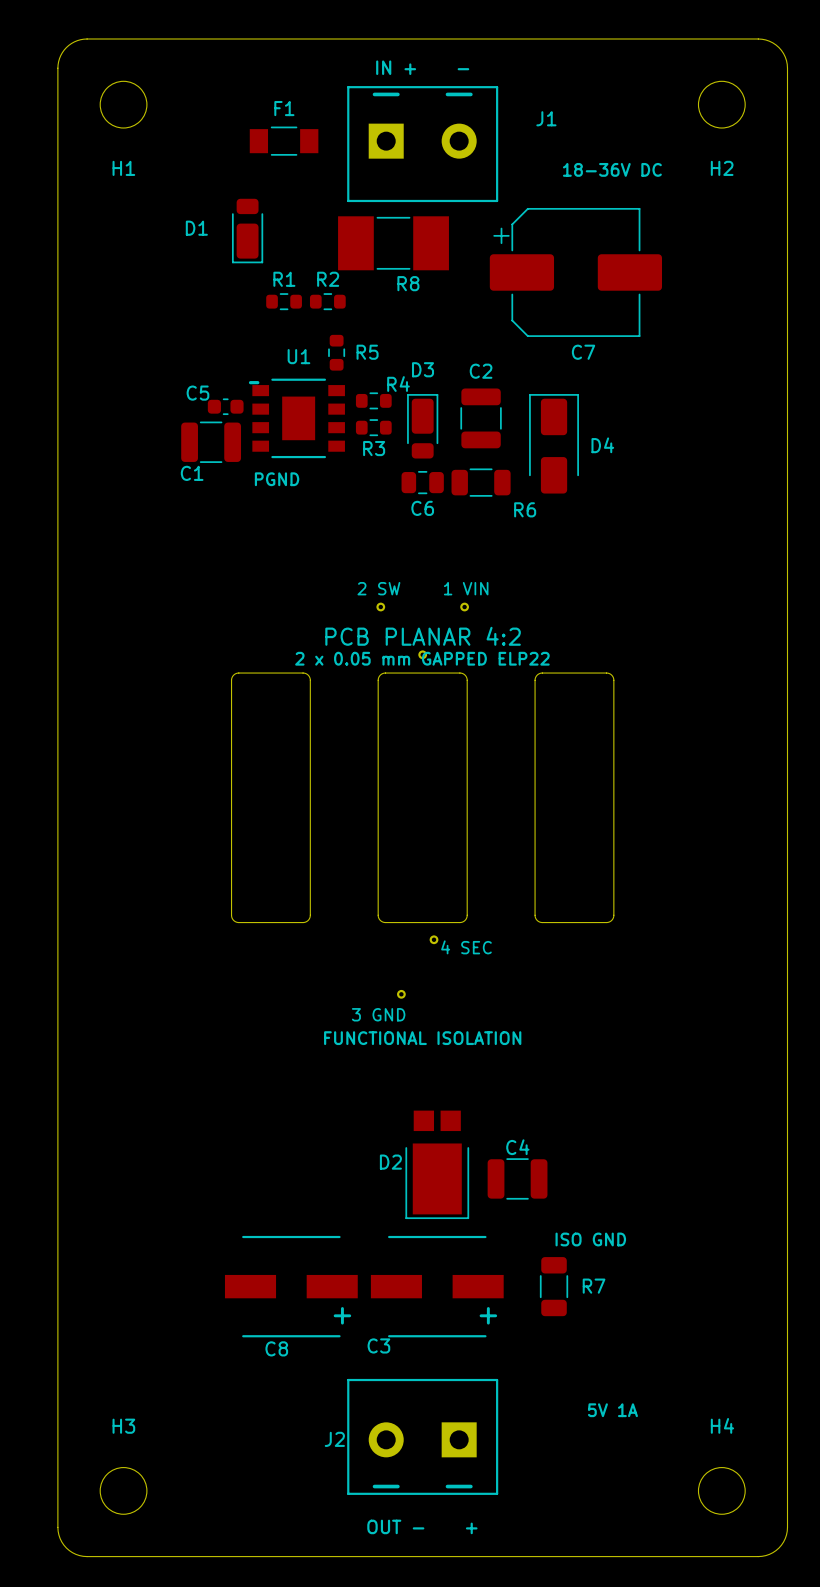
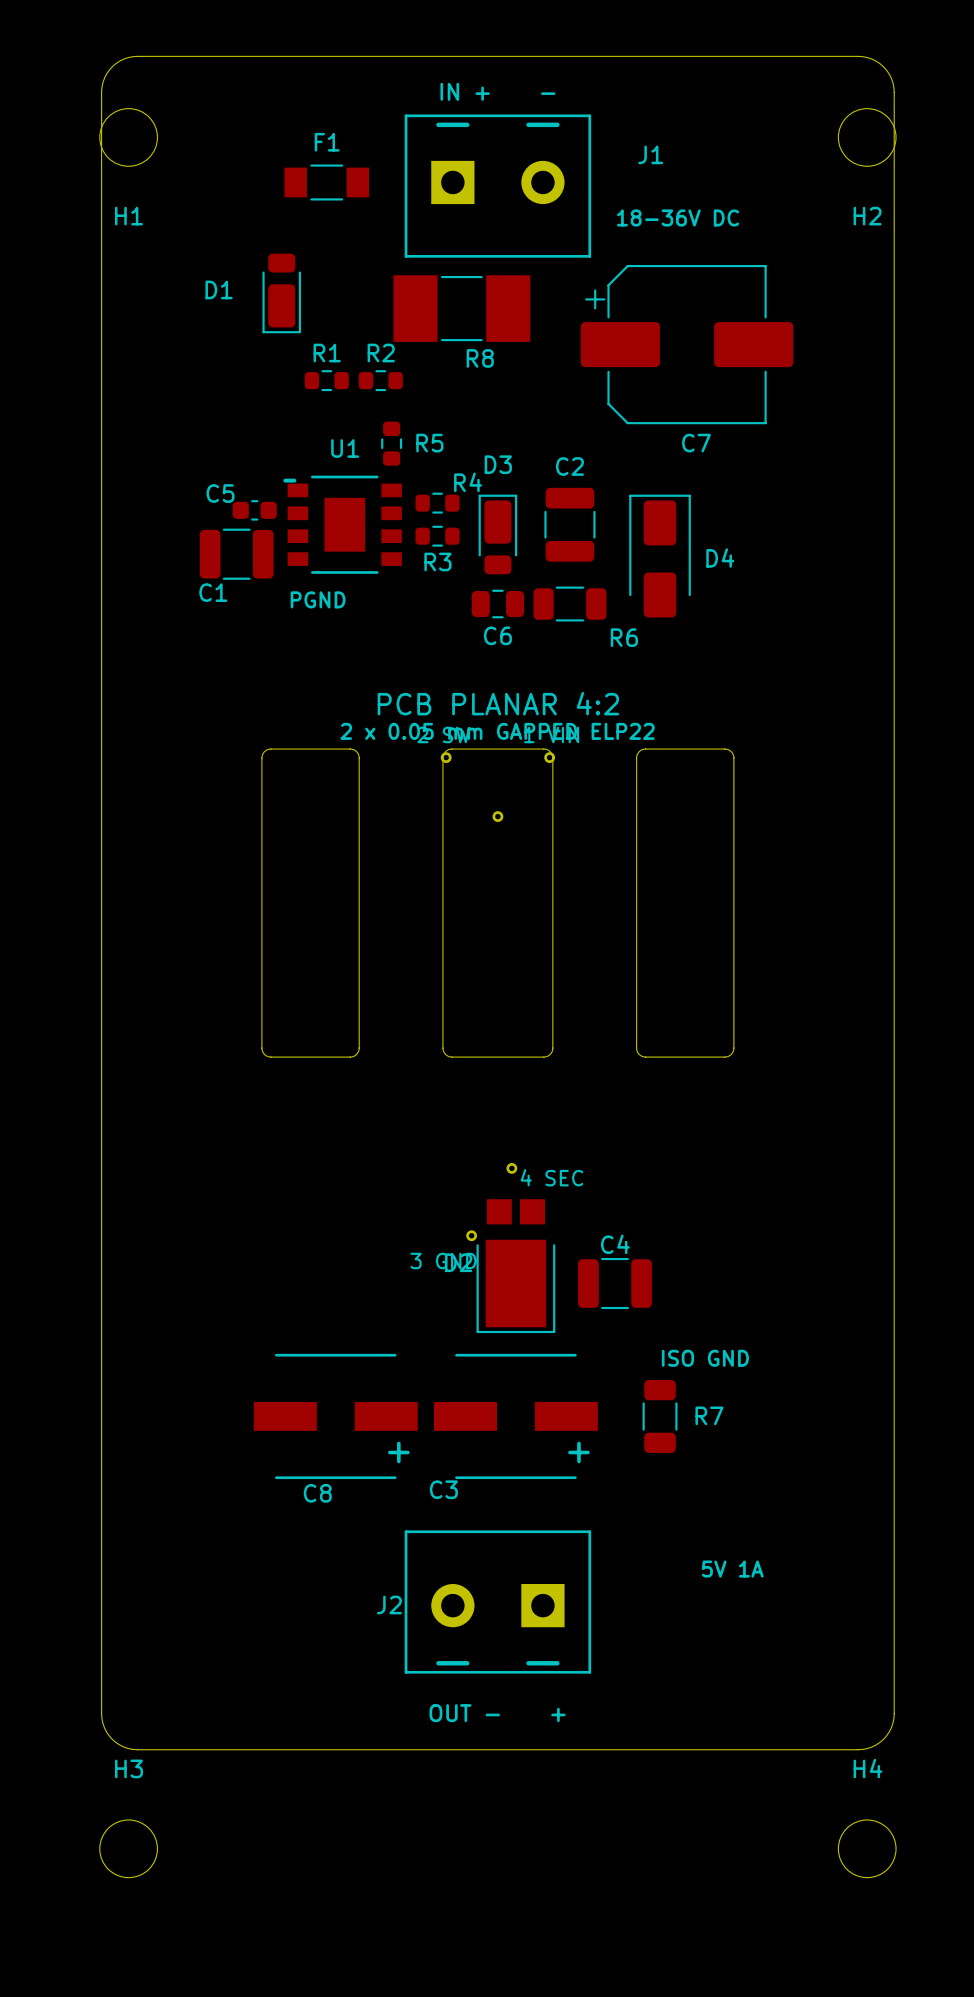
board edge: (130, 39) (77, 40) (68, 45) (62, 52) (57, 68) (57, 1527) (60, 1538) (66, 1548) (75, 1554) (87, 1556) (758, 1556) (772, 1552) (785, 1538) (787, 1527) (787, 68) (781, 50) (769, 41) (758, 39) (714, 39) -> (137, 56) (125, 58) (112, 66) (103, 80) (101, 92) (101, 1713) (104, 1727) (112, 1739) (123, 1746) (137, 1749) (858, 1749) (876, 1744) (883, 1739) (891, 1727) (894, 1713) (894, 92) (891, 78) (883, 66) (871, 59) (858, 56)
text position: 18-36V DC (612, 169) -> 18-36V DC (678, 217)
text position: PCB PLANAR 4:2 (423, 636) -> PCB PLANAR 4:2 (498, 703)
text position: 2 x 0.05 mm GAPPED ELP22 (422, 658) -> 2 x 0.05 mm GAPPED ELP22 (497, 731)
board edge: (231, 680) (233, 675) (238, 673) (303, 673) (308, 675) (310, 680) -> (261, 848) (261, 757) (264, 751) (270, 749) (350, 749) (356, 751) (359, 758) (359, 848)
board edge: (378, 680) (380, 675) (385, 673) (460, 673) (465, 675) (467, 680) -> (442, 848) (443, 757) (445, 751) (451, 749) (543, 749) (550, 751) (552, 758) (552, 848)
board edge: (535, 680) (537, 675) (542, 673) (607, 673) (612, 675) (613, 680) -> (636, 848) (636, 757) (639, 751) (645, 749) (724, 749) (731, 751) (733, 758) (733, 848)
board edge: (231, 842) (231, 916) (233, 920) (238, 922) (303, 922) (308, 920) (310, 915) (310, 842) -> (261, 1048) (264, 1054) (270, 1057) (351, 1057) (356, 1054) (359, 1048)
board edge: (378, 842) (378, 916) (380, 920) (385, 922) (459, 922) (465, 920) (467, 915) (467, 842) -> (442, 1048) (445, 1054) (451, 1057) (545, 1057) (550, 1054) (552, 1048)
board edge: (535, 842) (535, 916) (537, 920) (542, 922) (606, 922) (611, 920) (613, 915) (613, 842) -> (636, 1048) (639, 1054) (645, 1057) (726, 1057) (731, 1054) (733, 1048)
text: FUNCTIONAL ISOLATION (422, 1038) -> none
D2 position: (437, 1164) -> (515, 1266)
C4 position: (517, 1178) -> (615, 1283)
text position: ISO GND (590, 1239) -> ISO GND (705, 1358)
C8 position: (291, 1286) -> (335, 1416)
C3 position: (437, 1286) -> (515, 1416)
R7 position: (554, 1286) -> (660, 1416)
text position: 5V 1A (612, 1410) -> 5V 1A (732, 1569)
J2 position: (422, 1436) -> (497, 1602)
text position: OUT - + (422, 1526) -> OUT - + (497, 1713)

